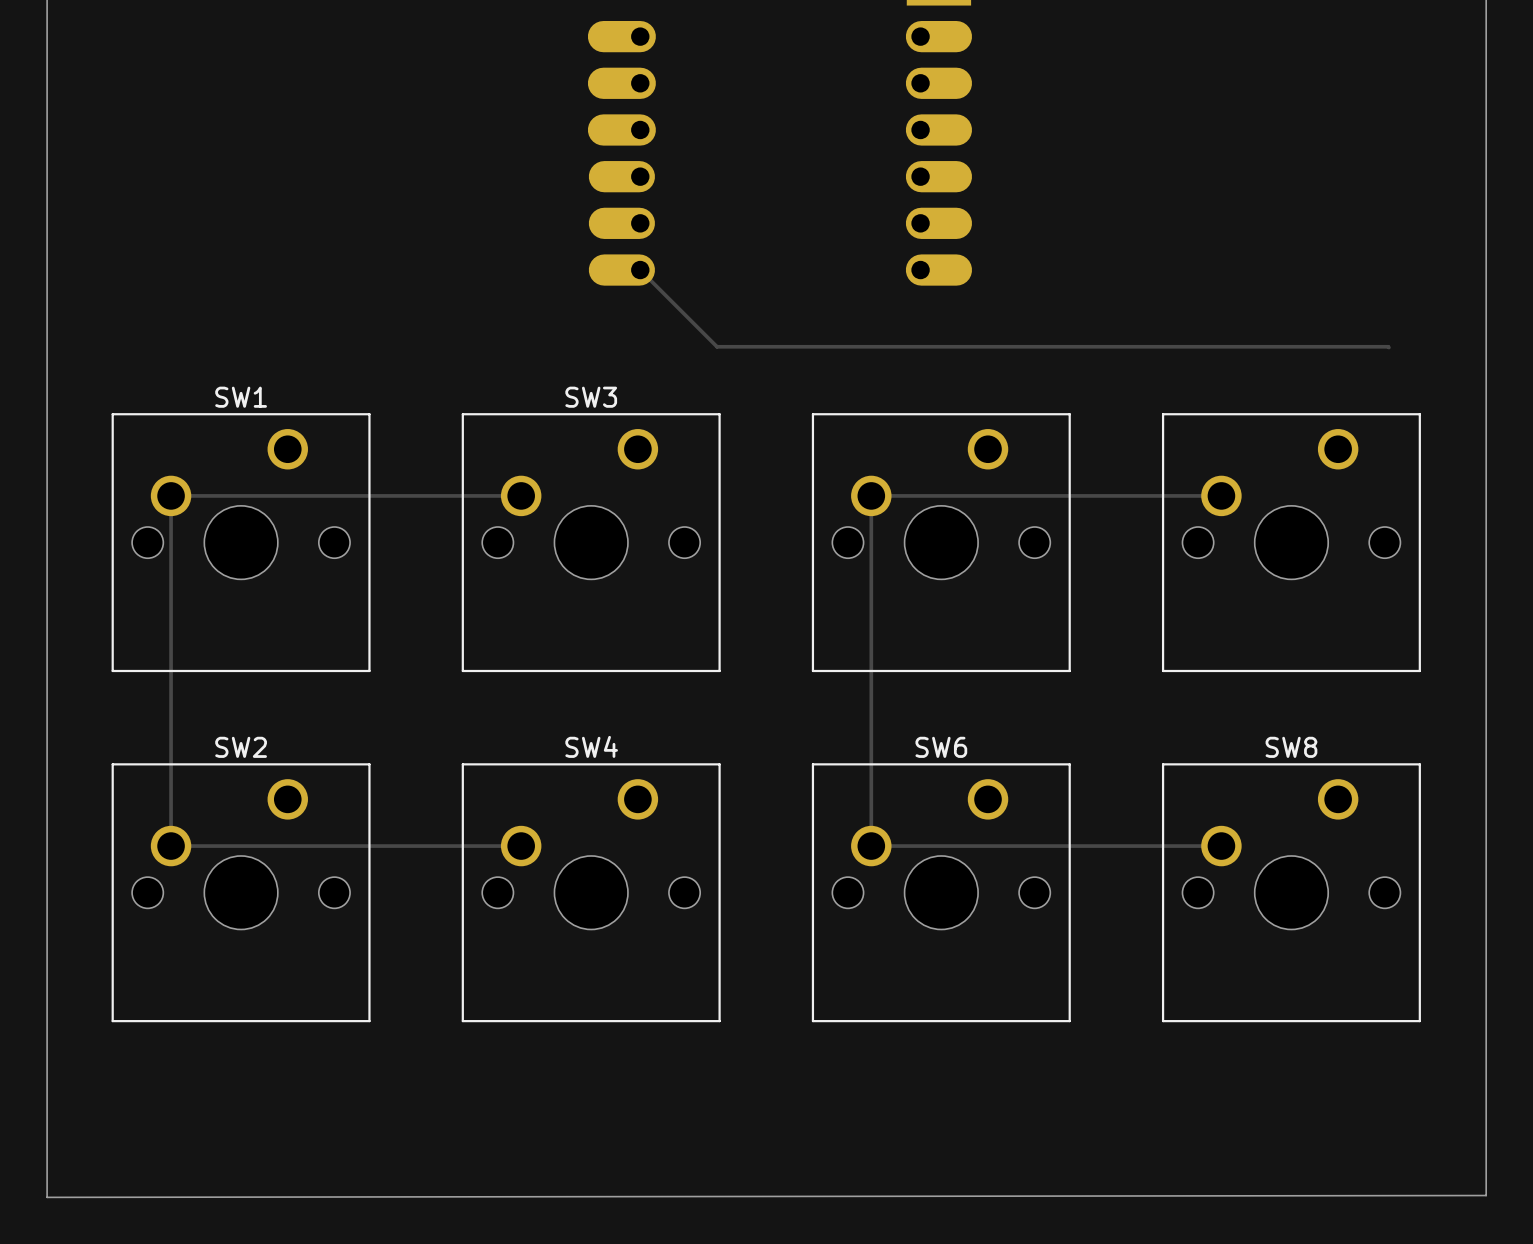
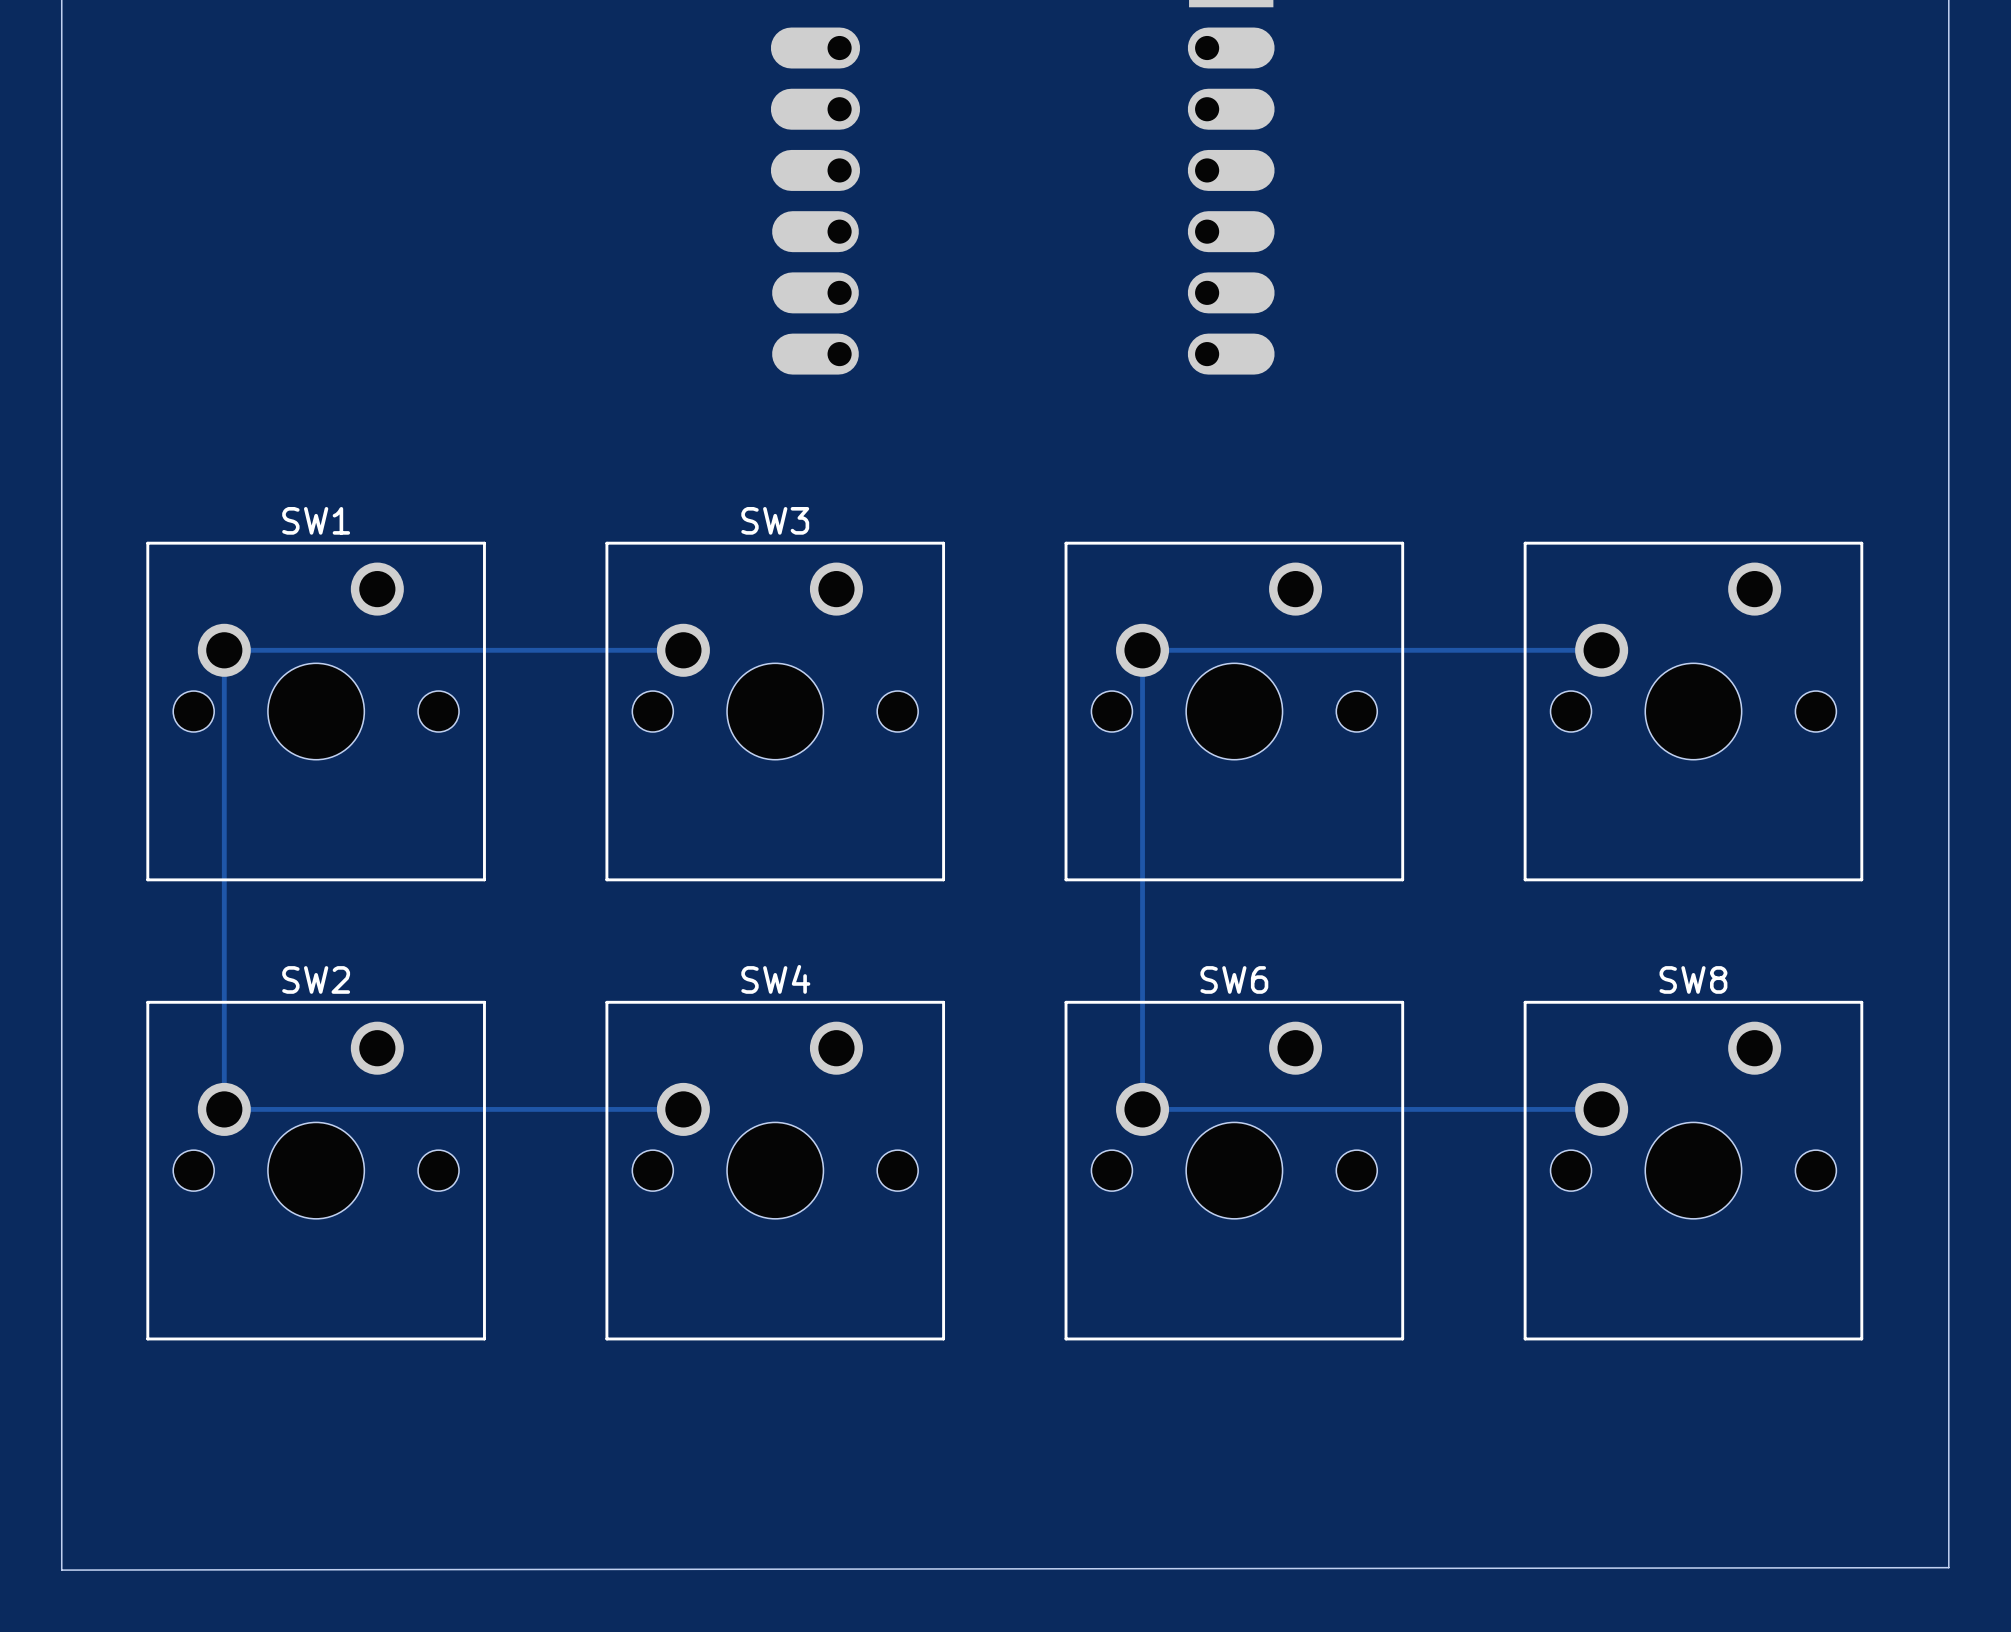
track: (640, 270) (717, 346) (1388, 347) -> none

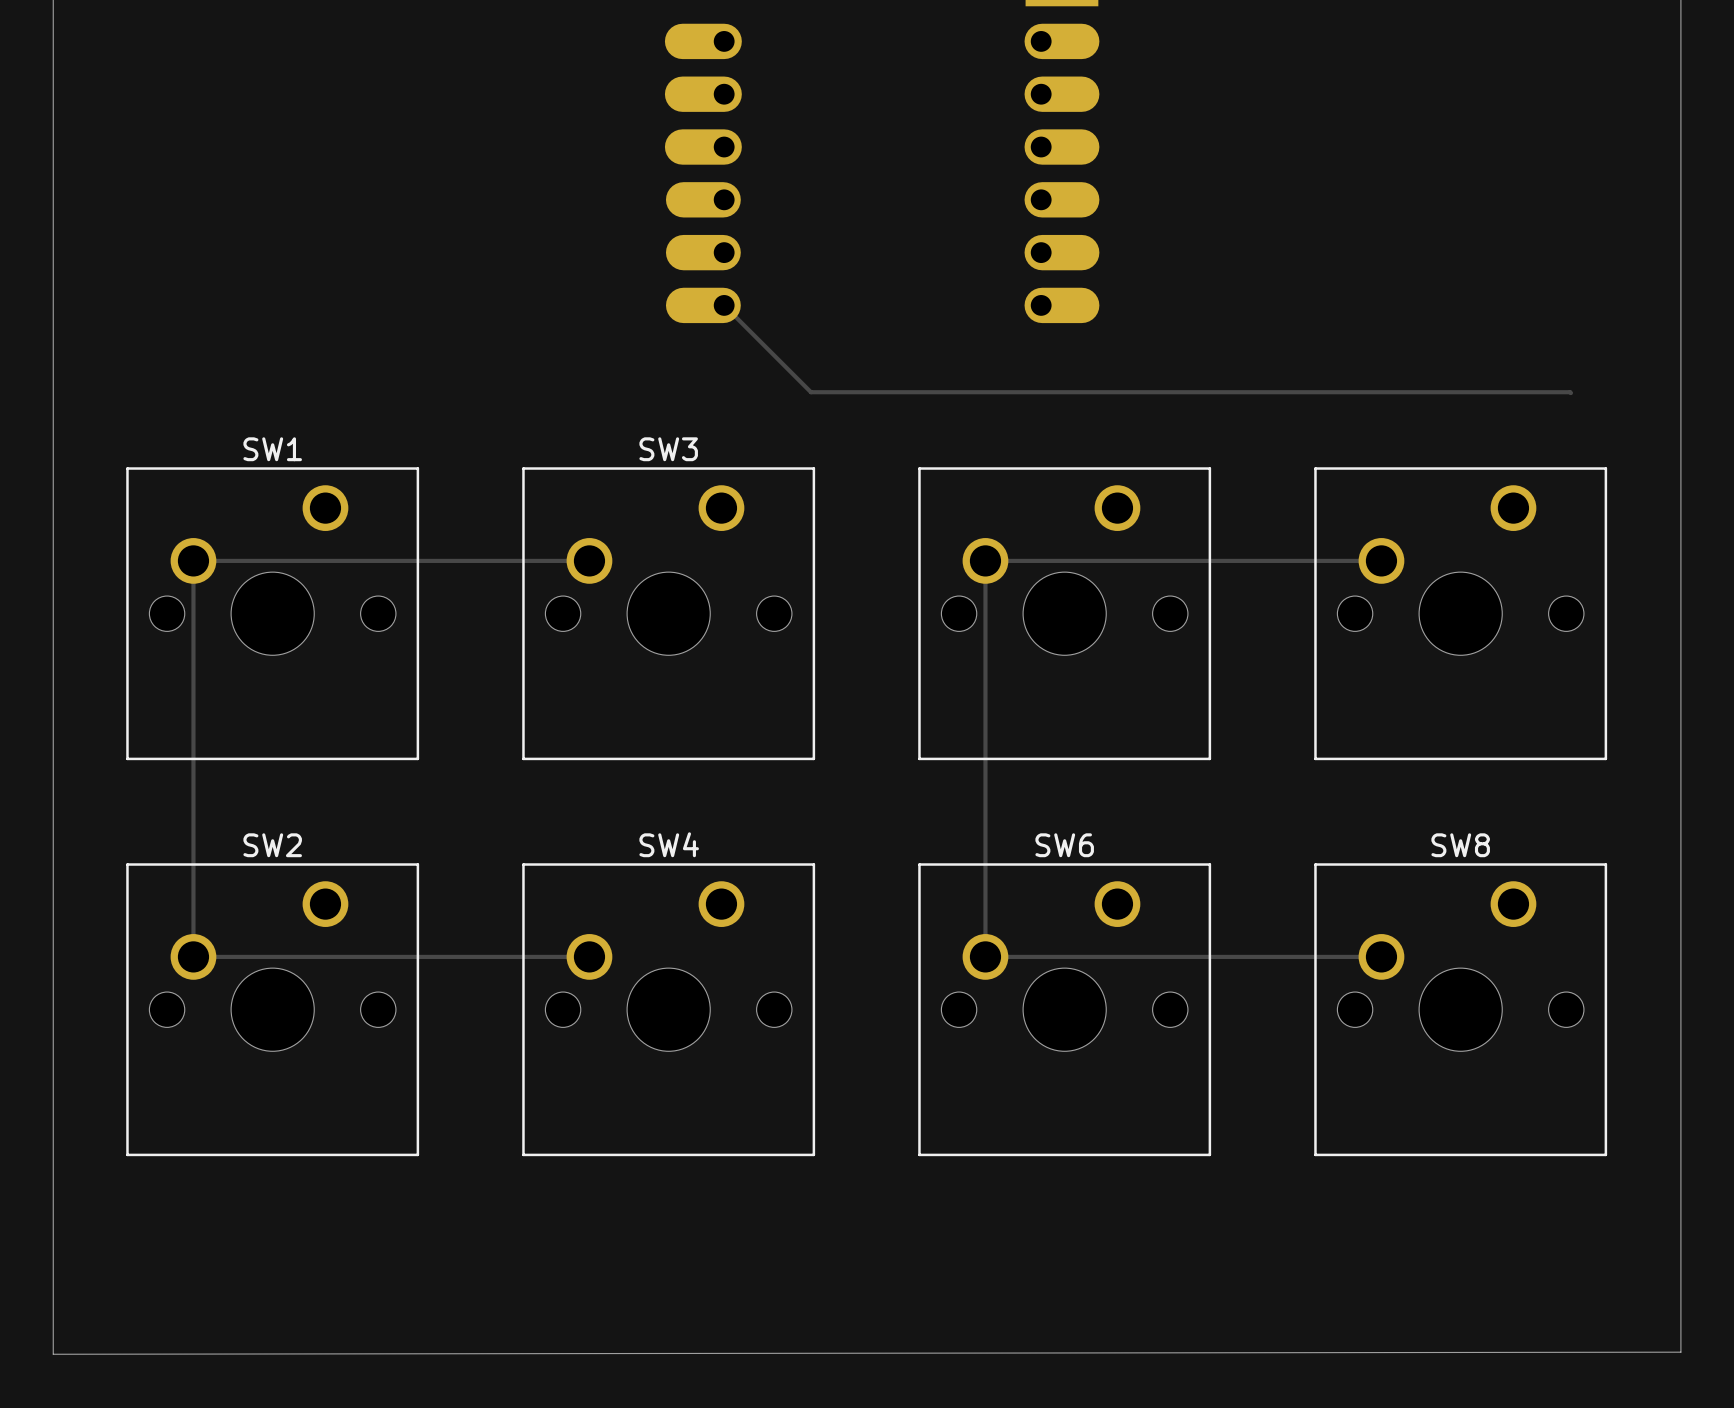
track: none -> (724, 305) (810, 392) (1570, 393)

